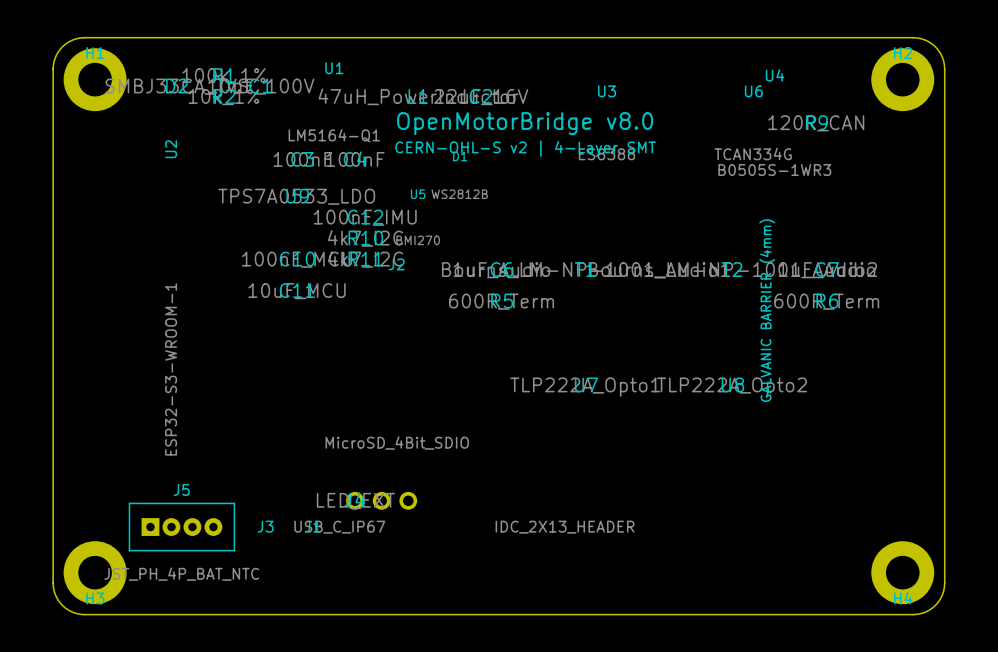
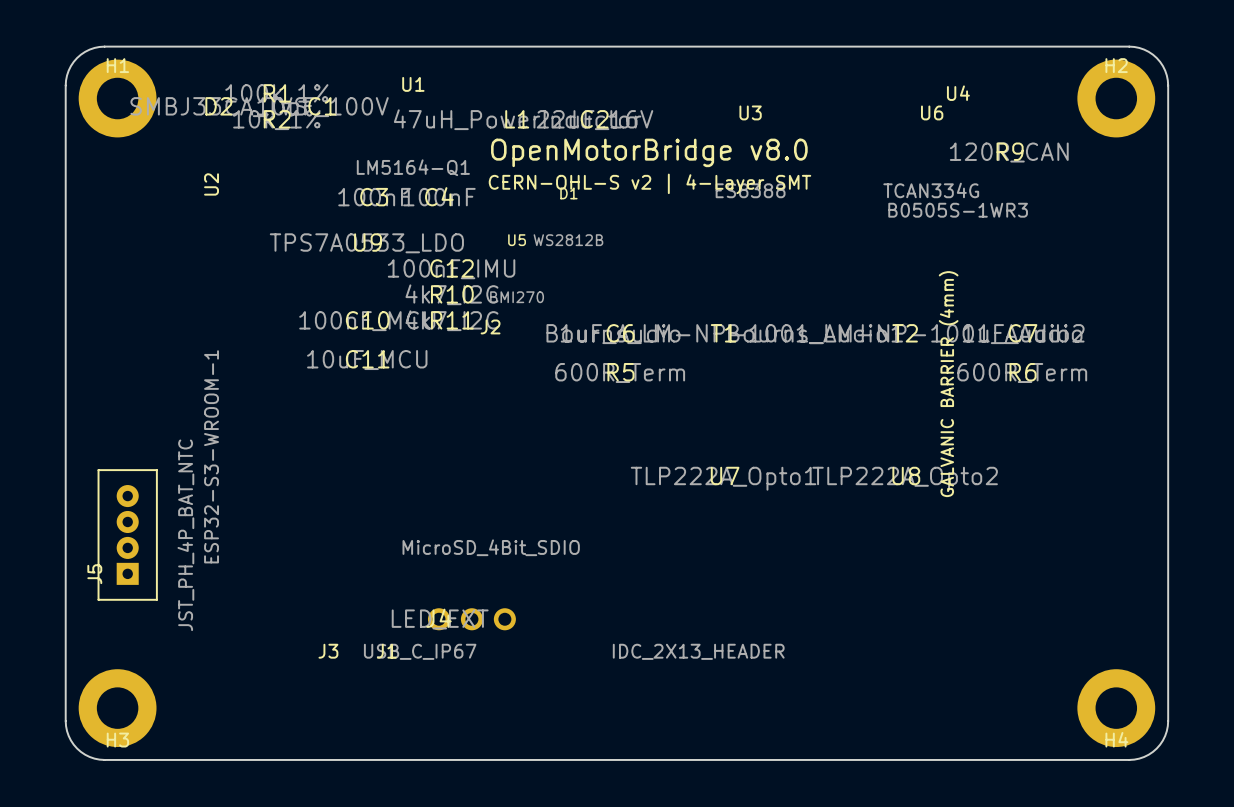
J5 name position: J5 (181, 489) -> J5 (94, 574)
J5 rotation: 0° (181, 527) -> 90° counterclockwise (127, 534)
J5 position: (181, 527) -> (127, 534)

